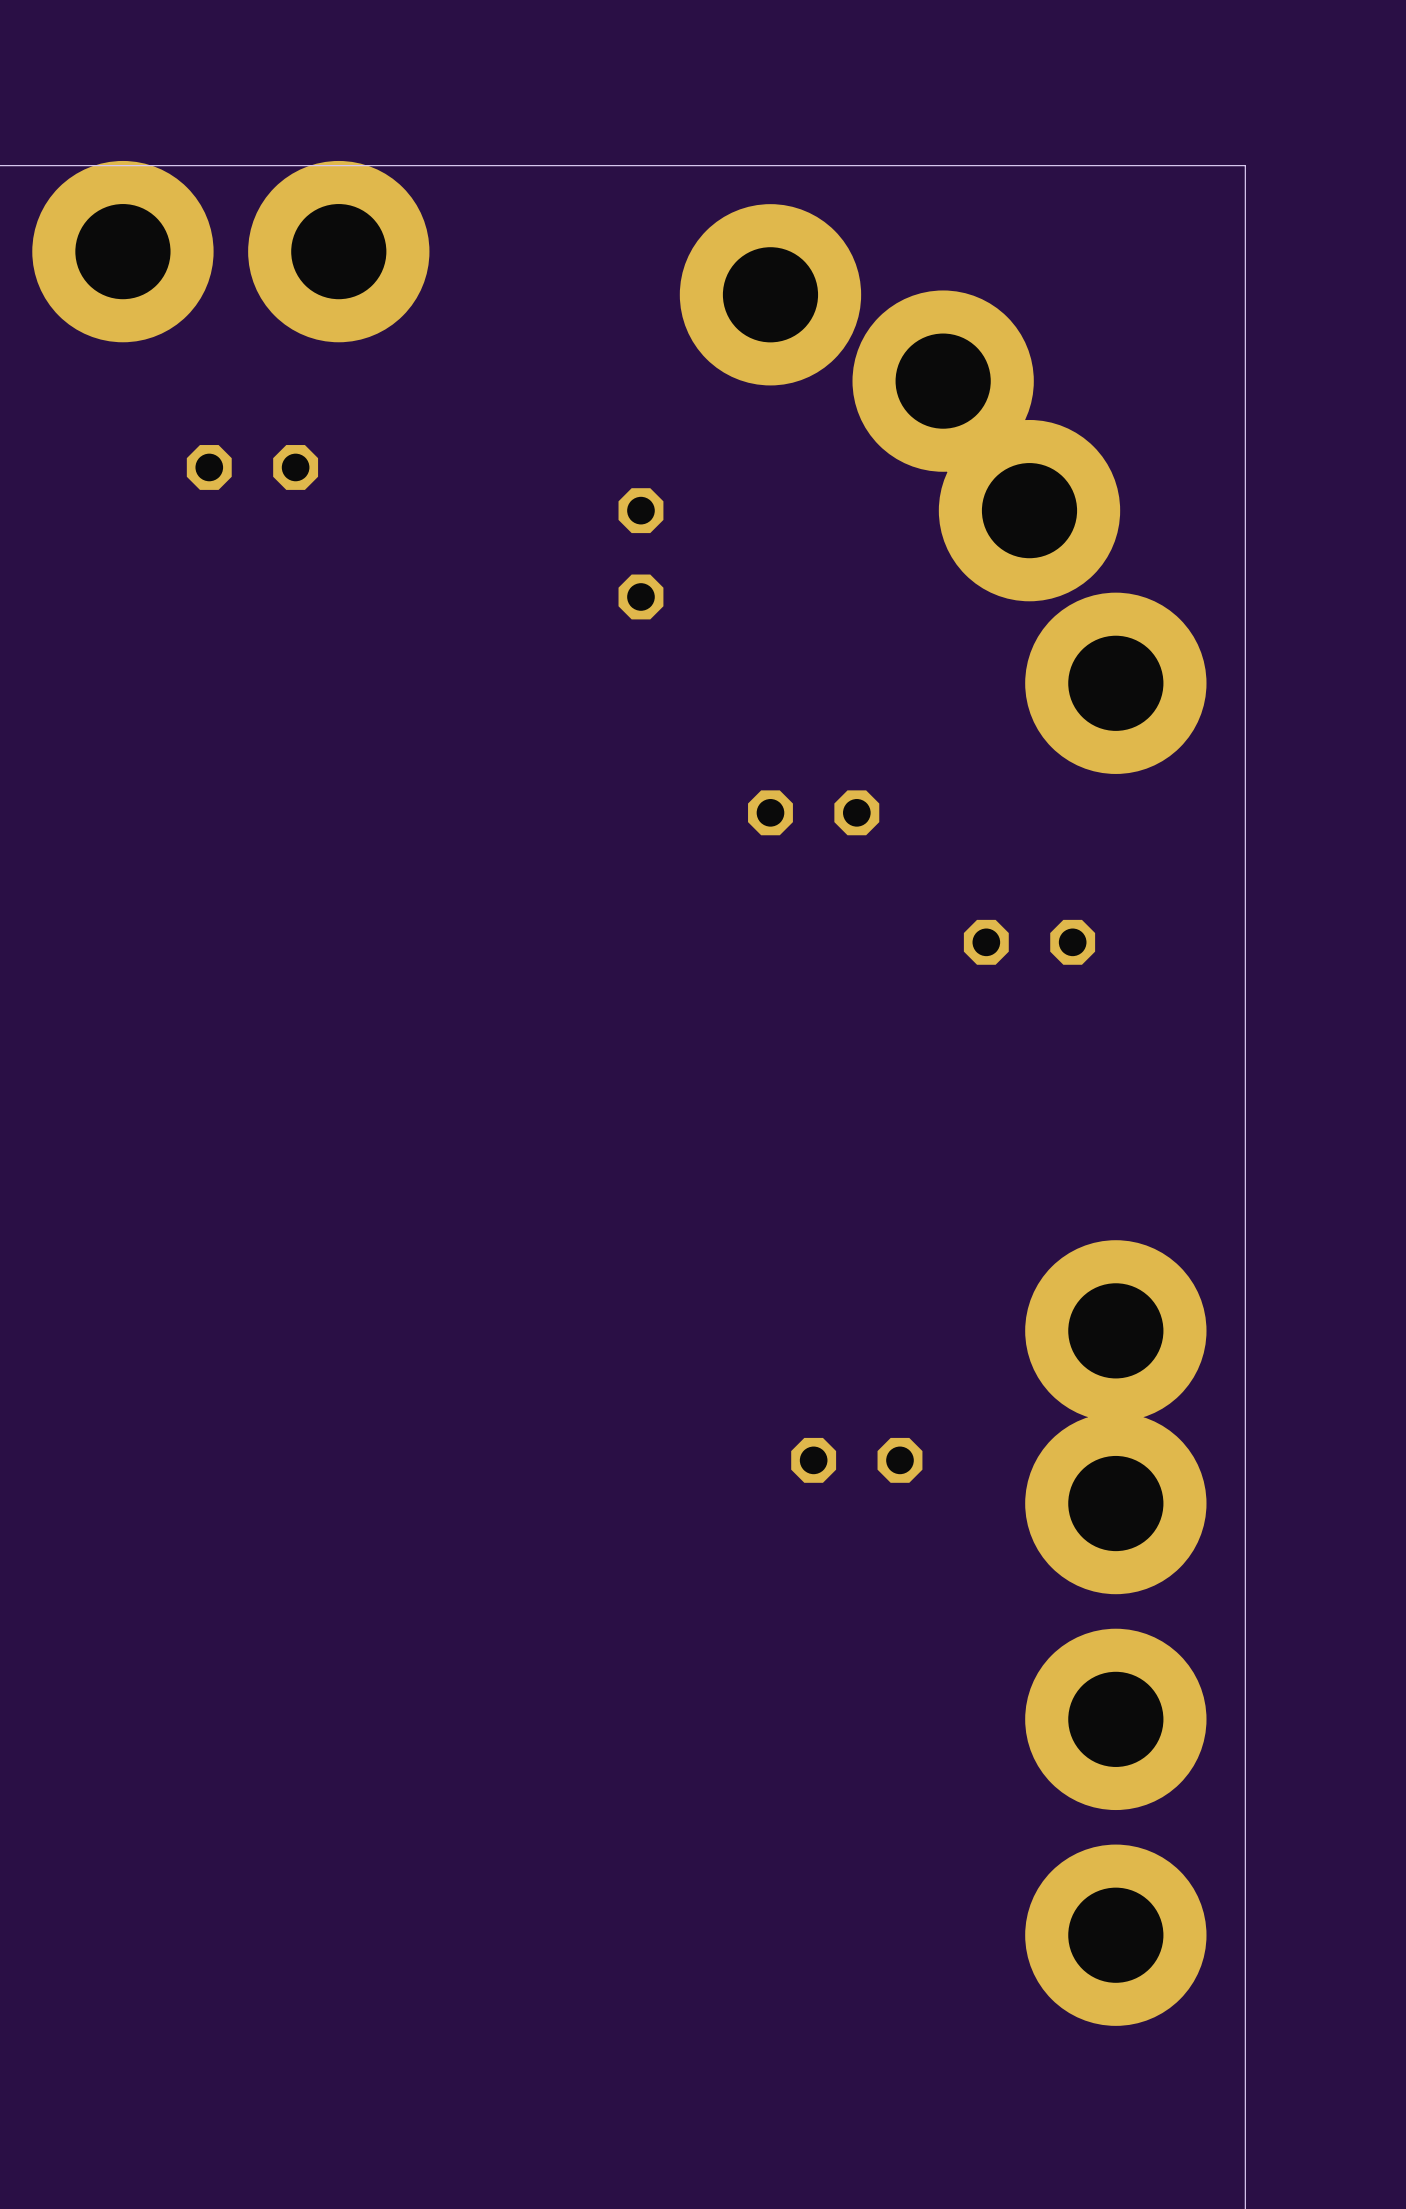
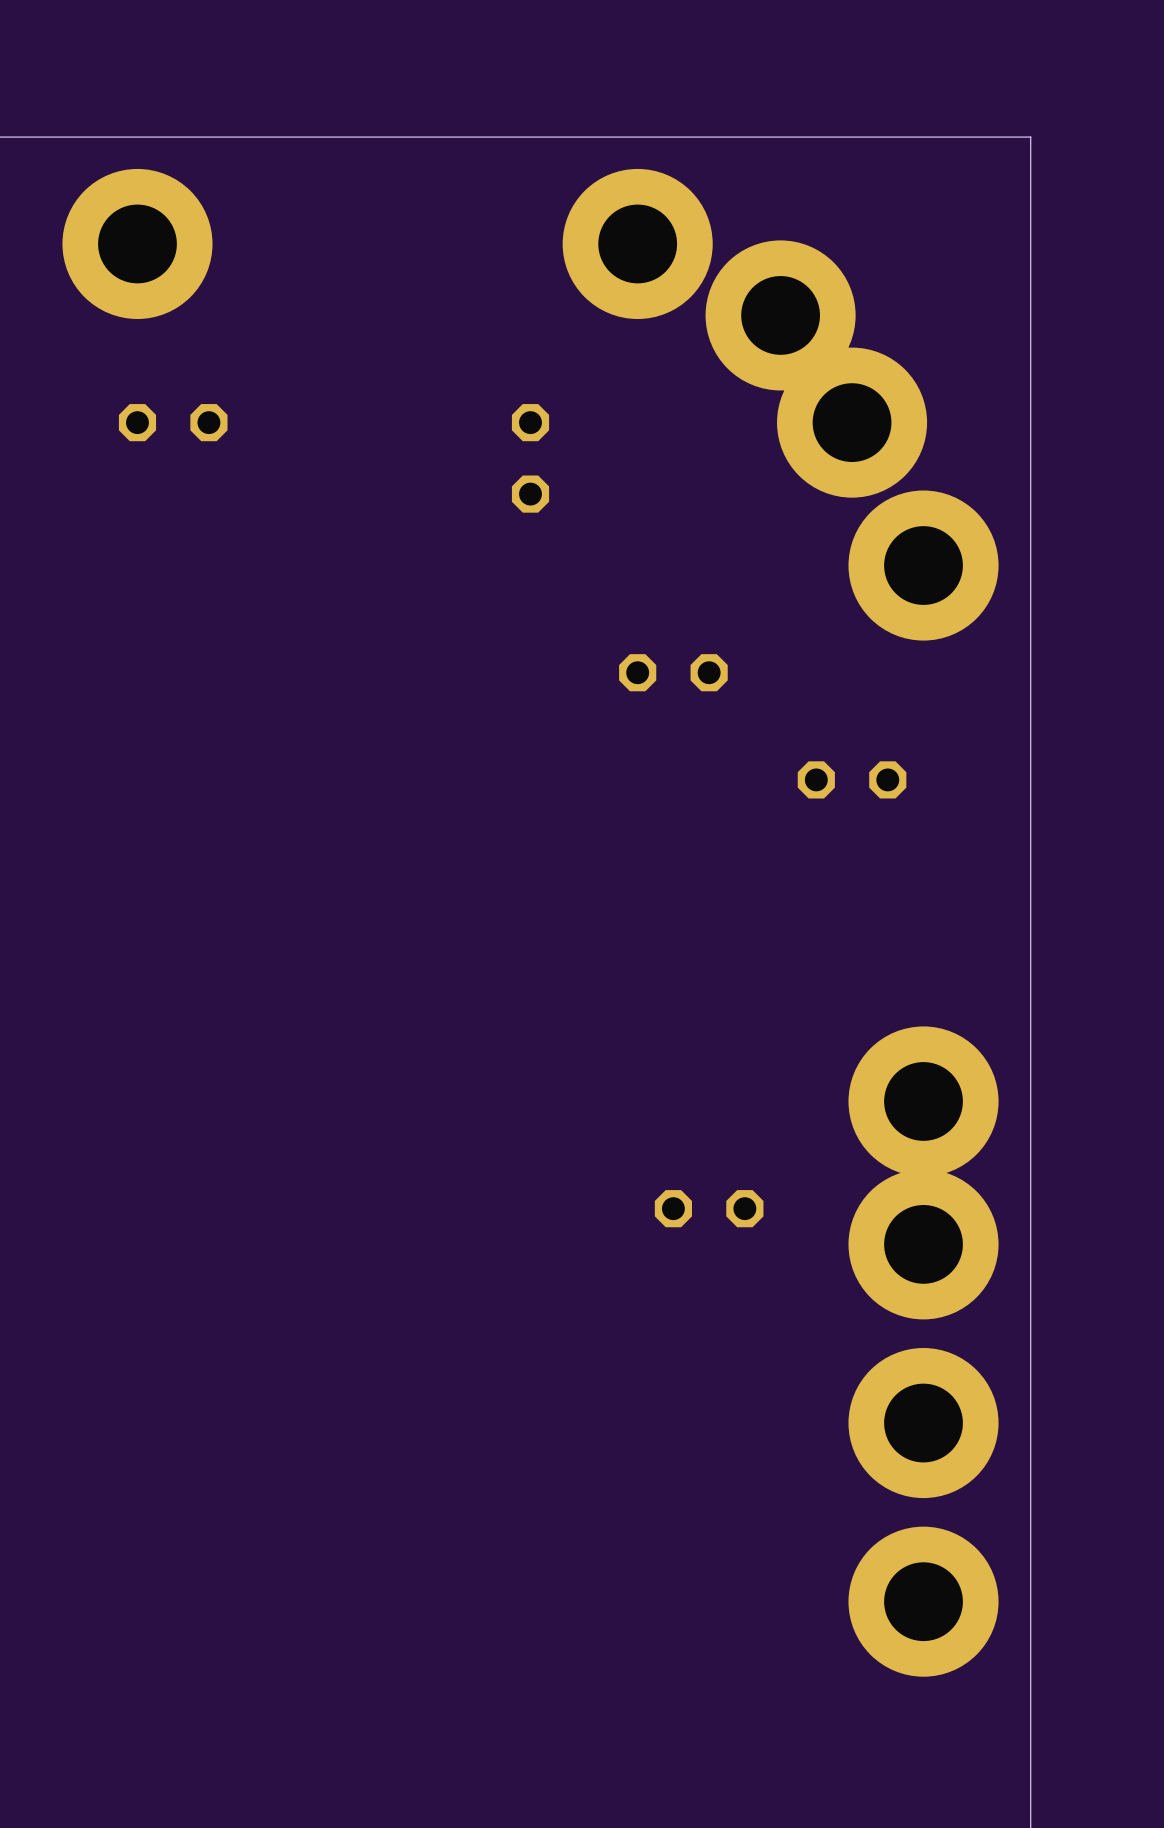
part position: (122, 251) -> (137, 243)
part: (338, 251) -> none
part position: (252, 467) -> (173, 422)

